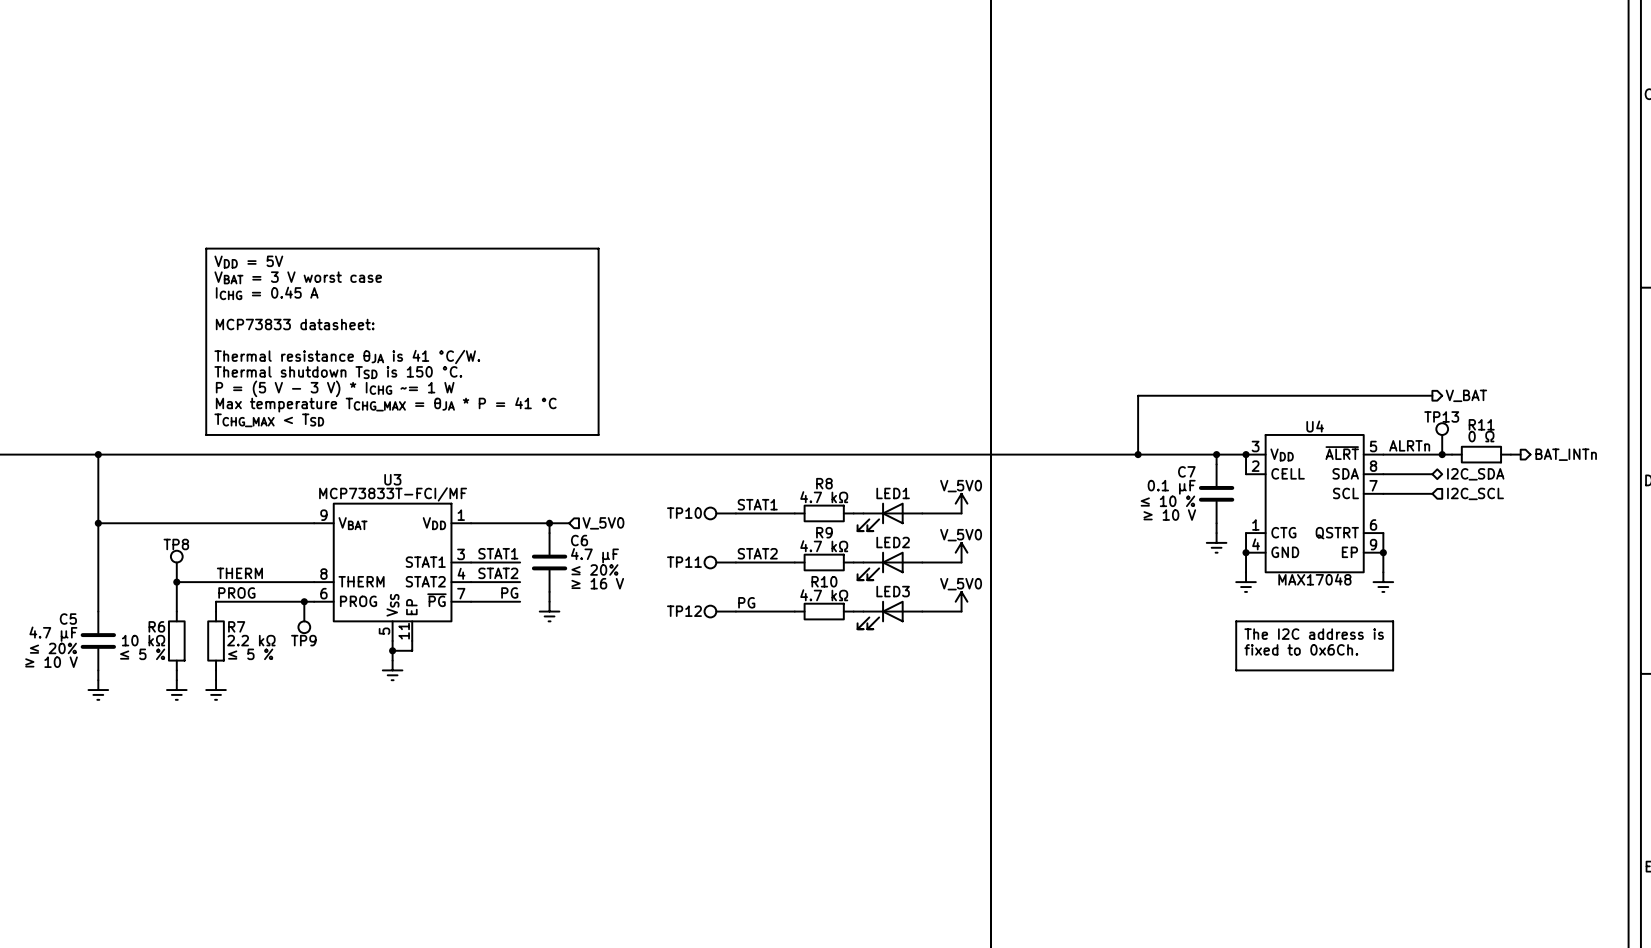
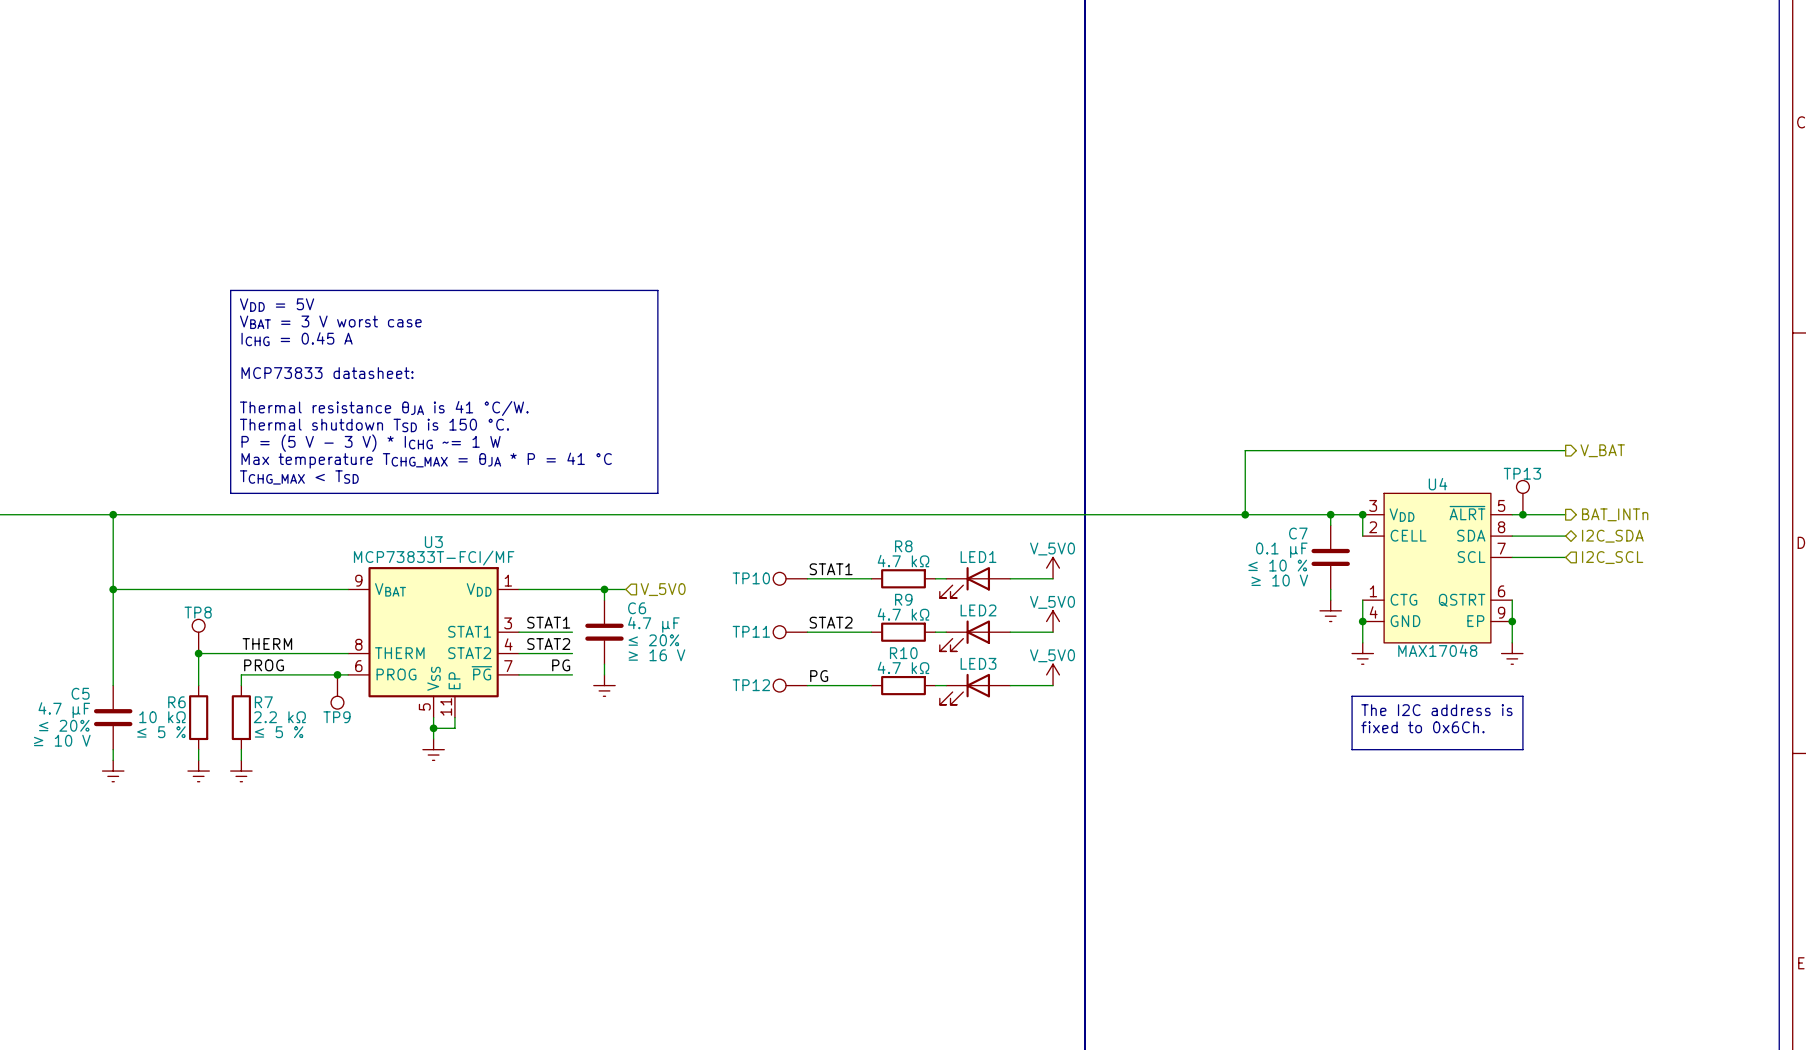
TP13 position: (1442, 438) -> (1522, 497)
label: ALRTn (1409, 445) -> none
junction: none -> (1522, 514)
wire: (1432, 454) (1452, 454) -> none
junction: (1442, 454) -> none
R11: 0 Ω (1481, 454) -> none
wire: (1510, 454) (1520, 454) -> none
hierarchical label position: BAT_INTn (1566, 454) -> BAT_INTn (1615, 514)

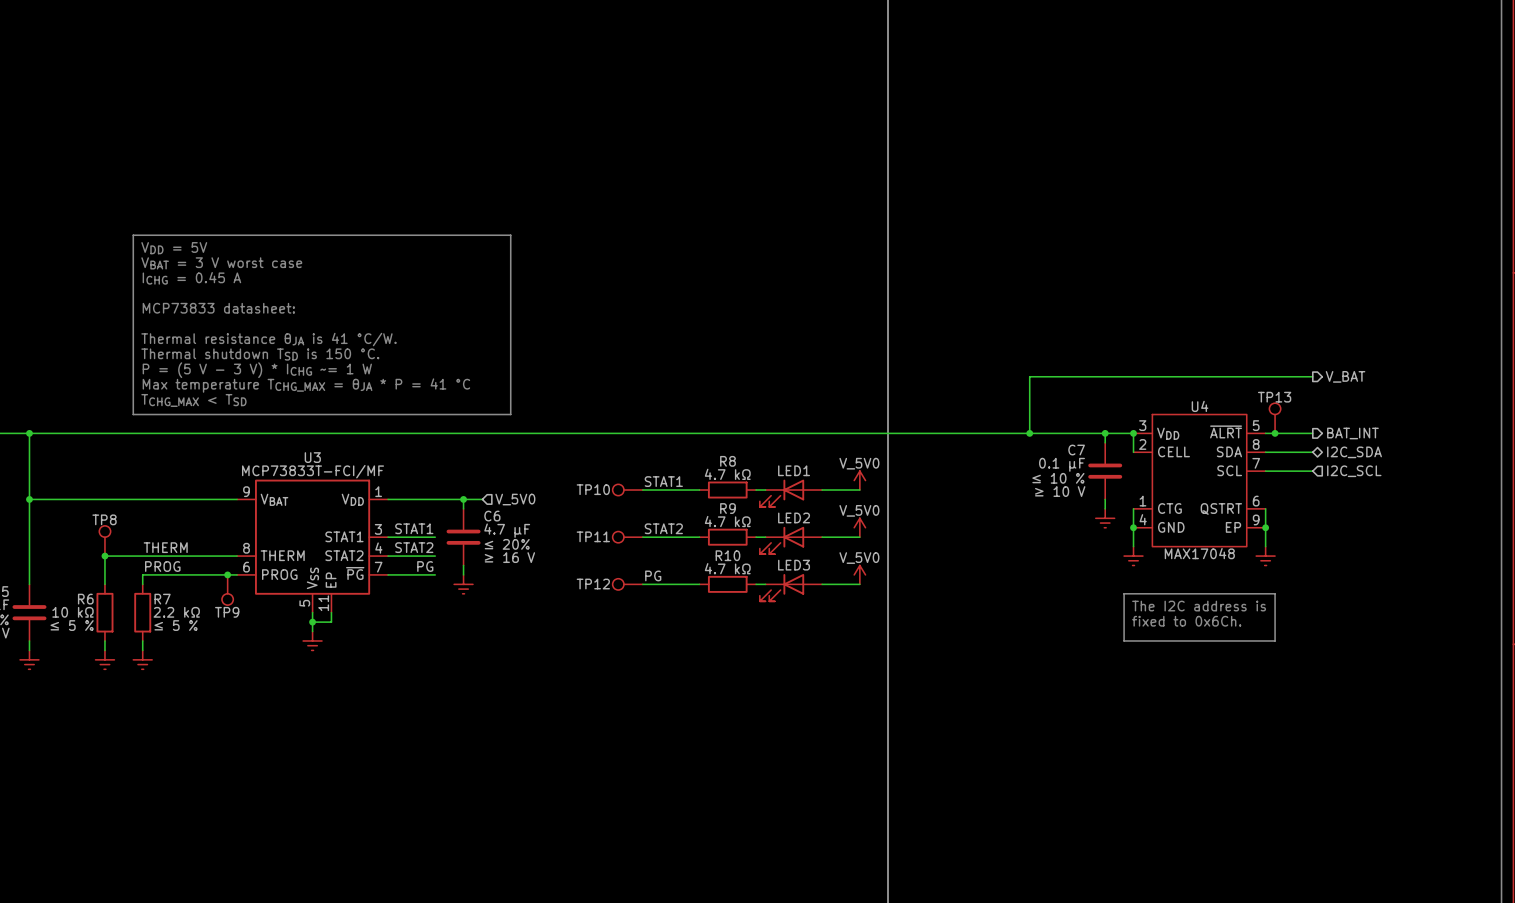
hierarchical label: BAT_INTn (1615, 514) -> BAT_INT (1352, 433)

